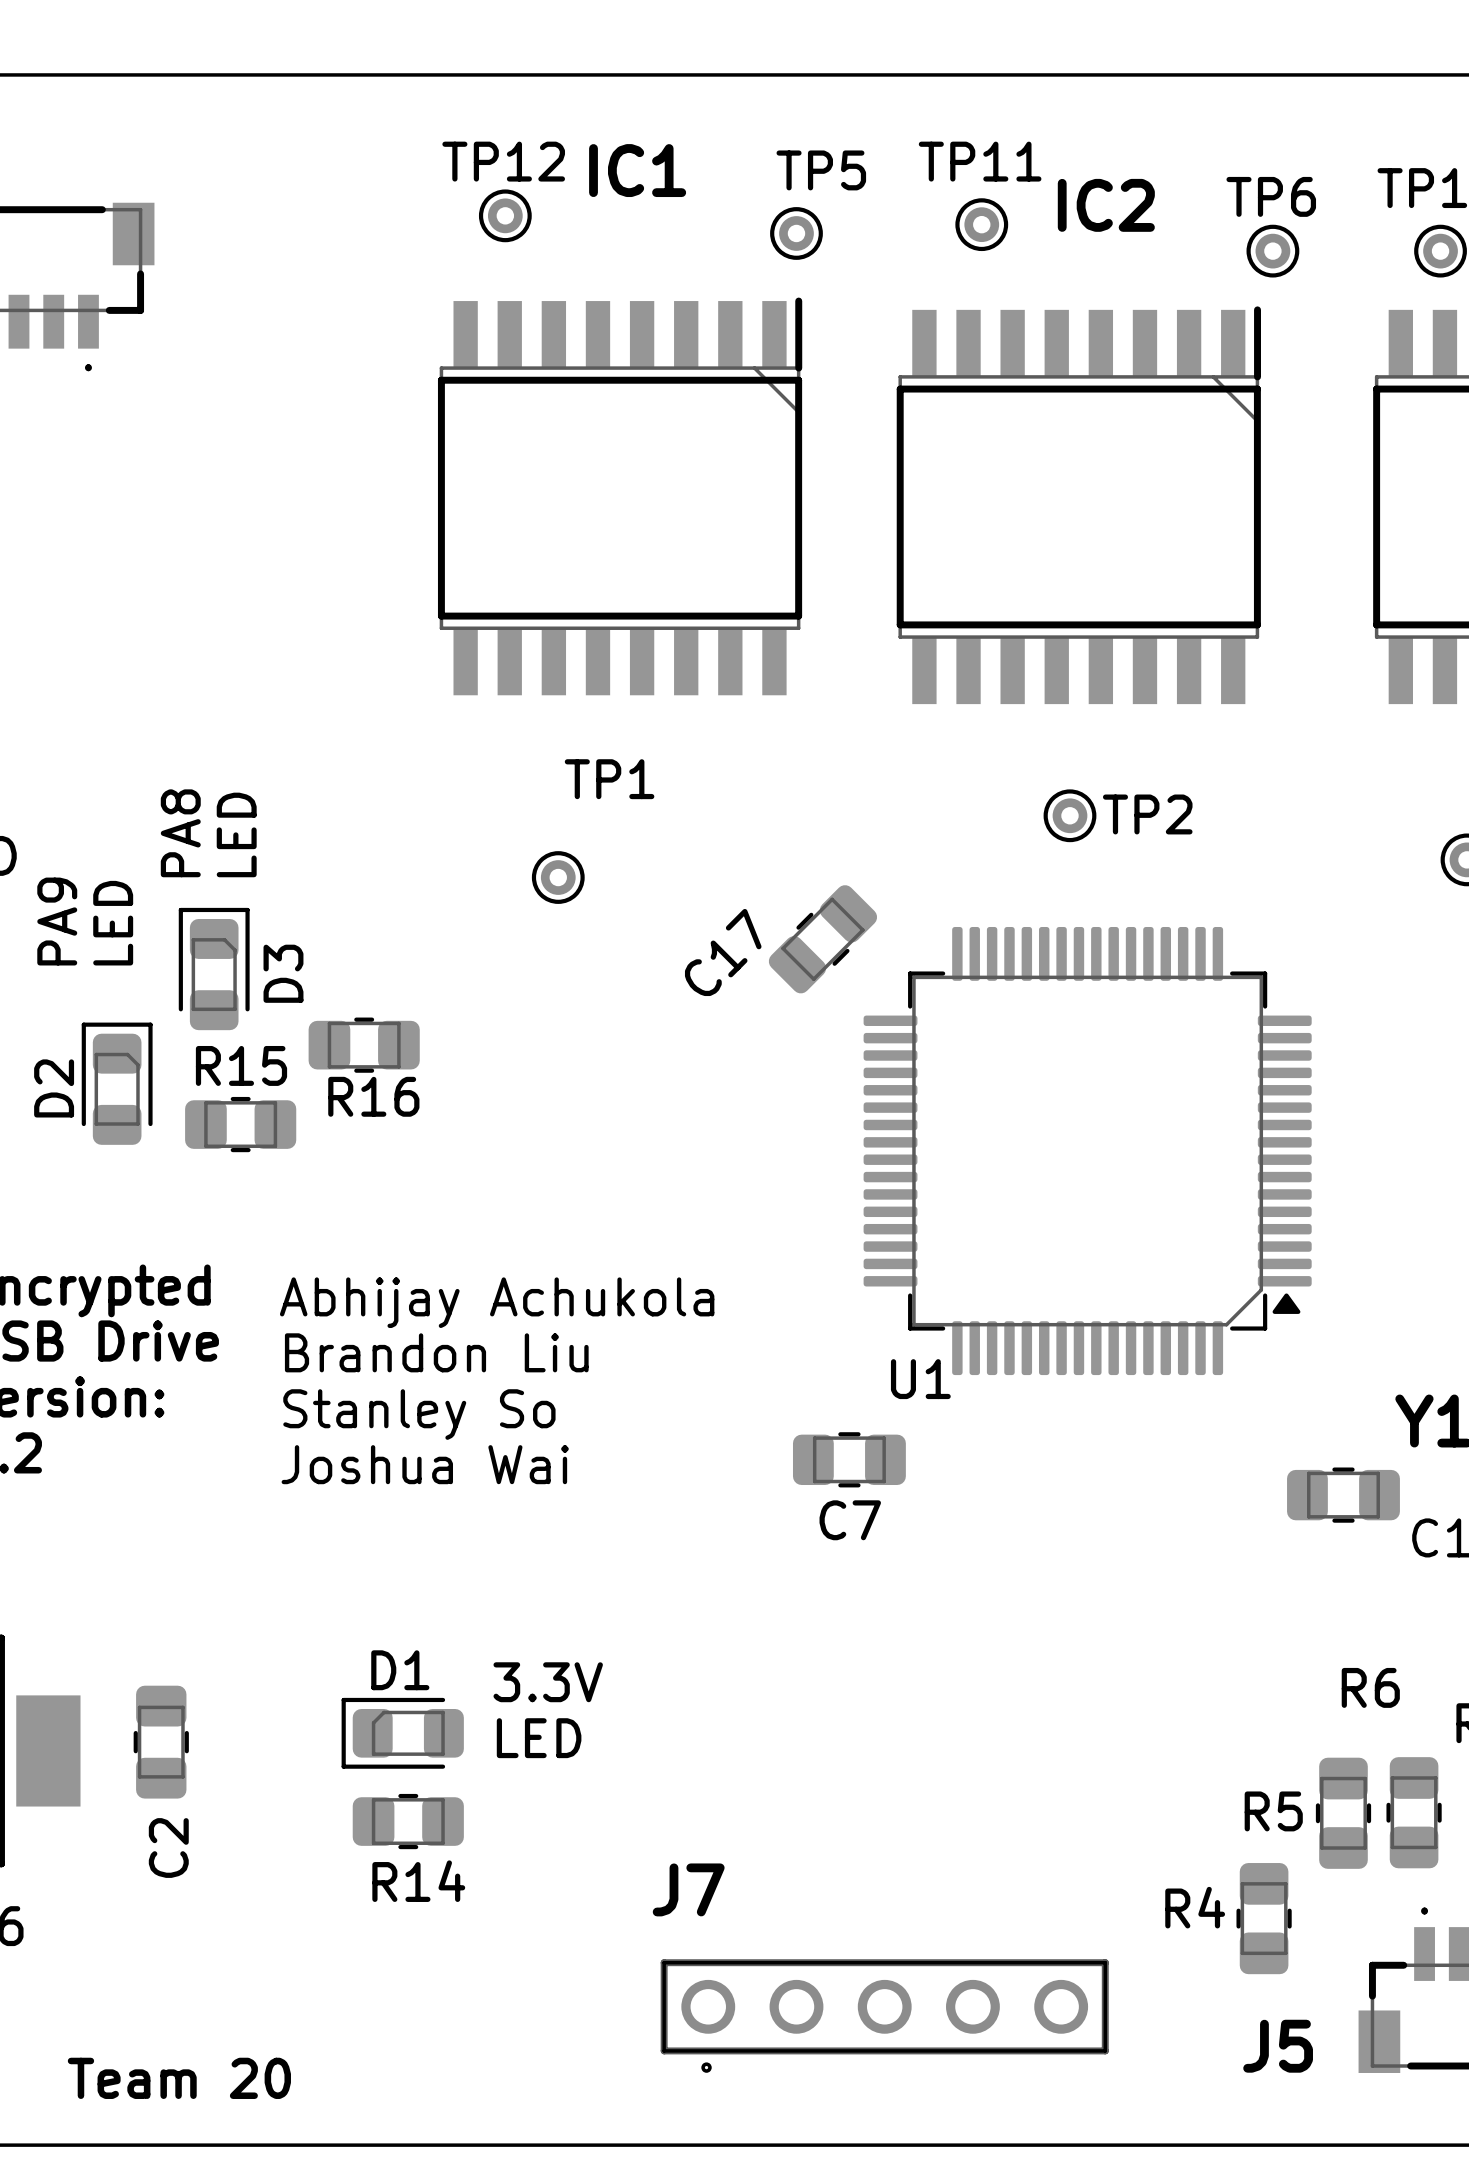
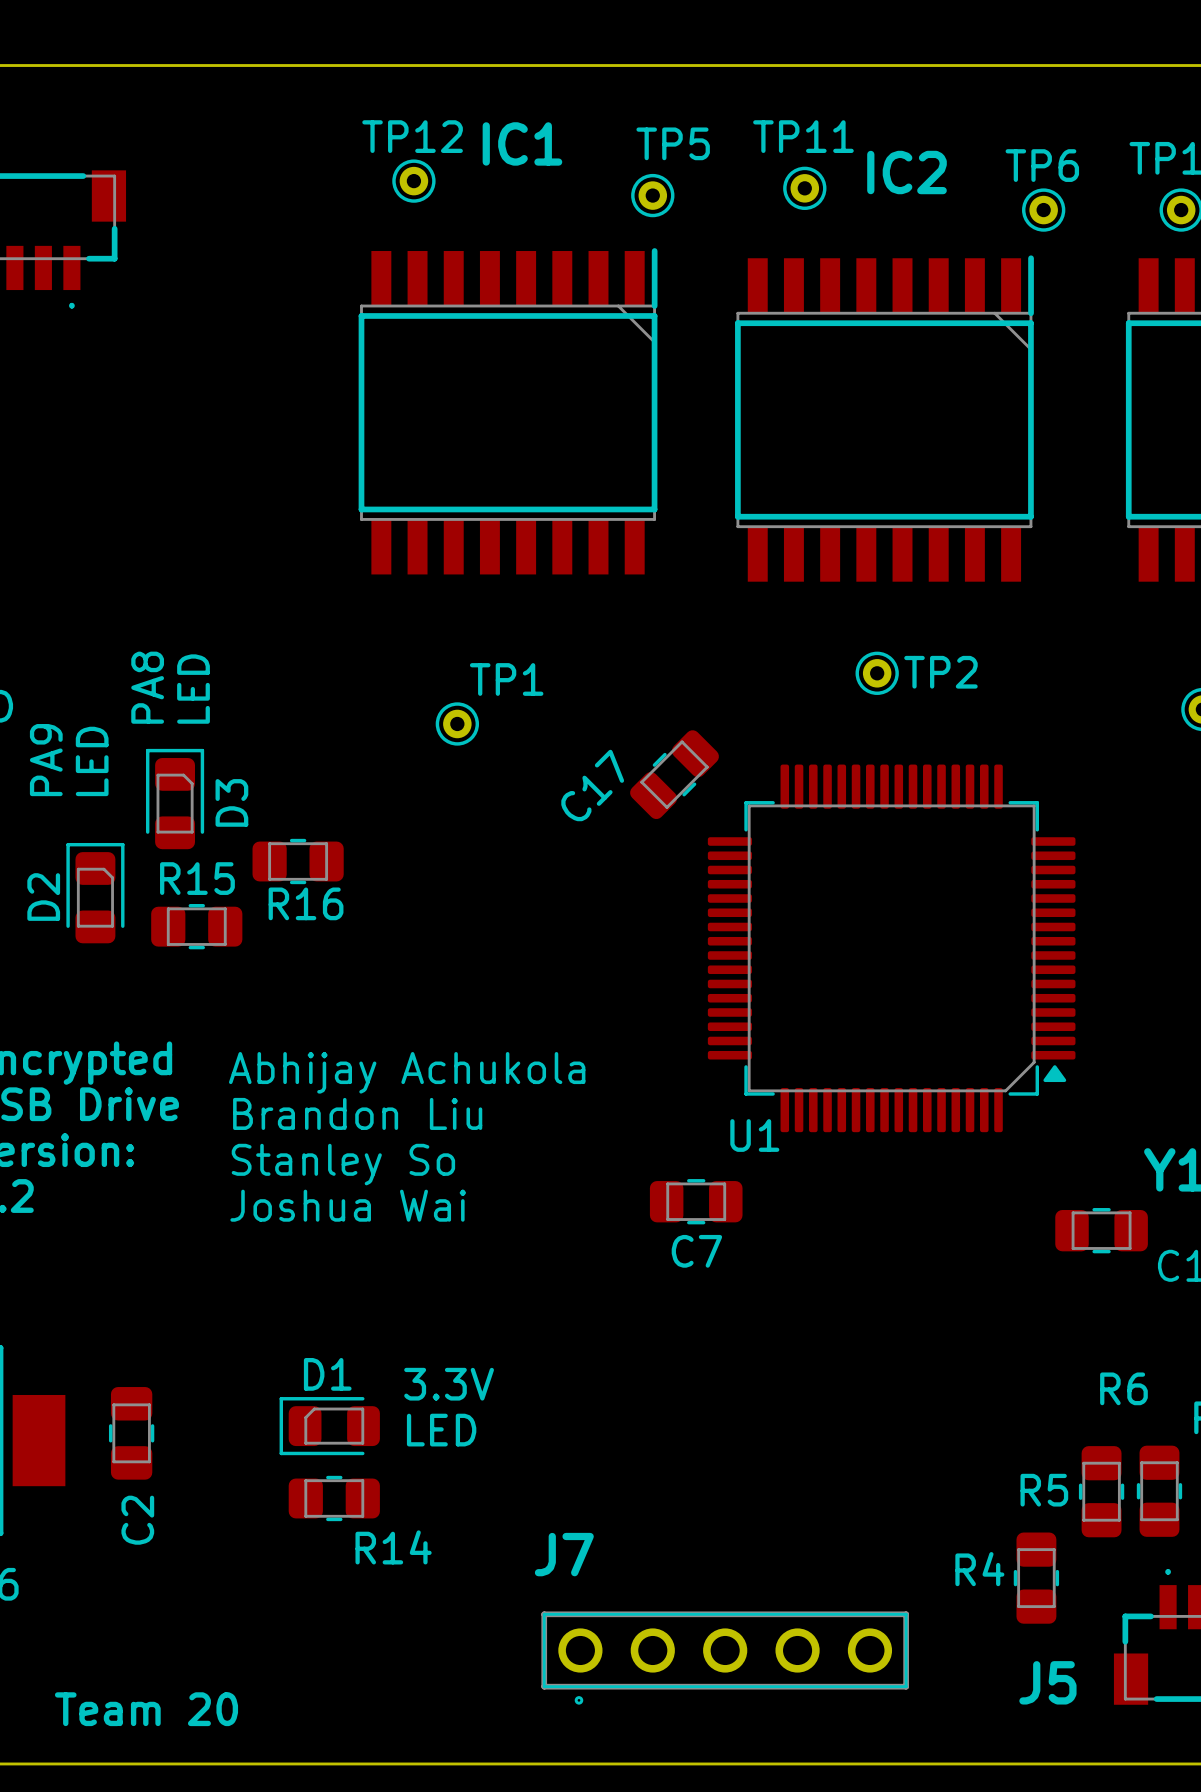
TP1 name position: TP1 (609, 779) -> TP1 (506, 679)
R14 name position: R14 (418, 1881) -> R14 (393, 1547)

